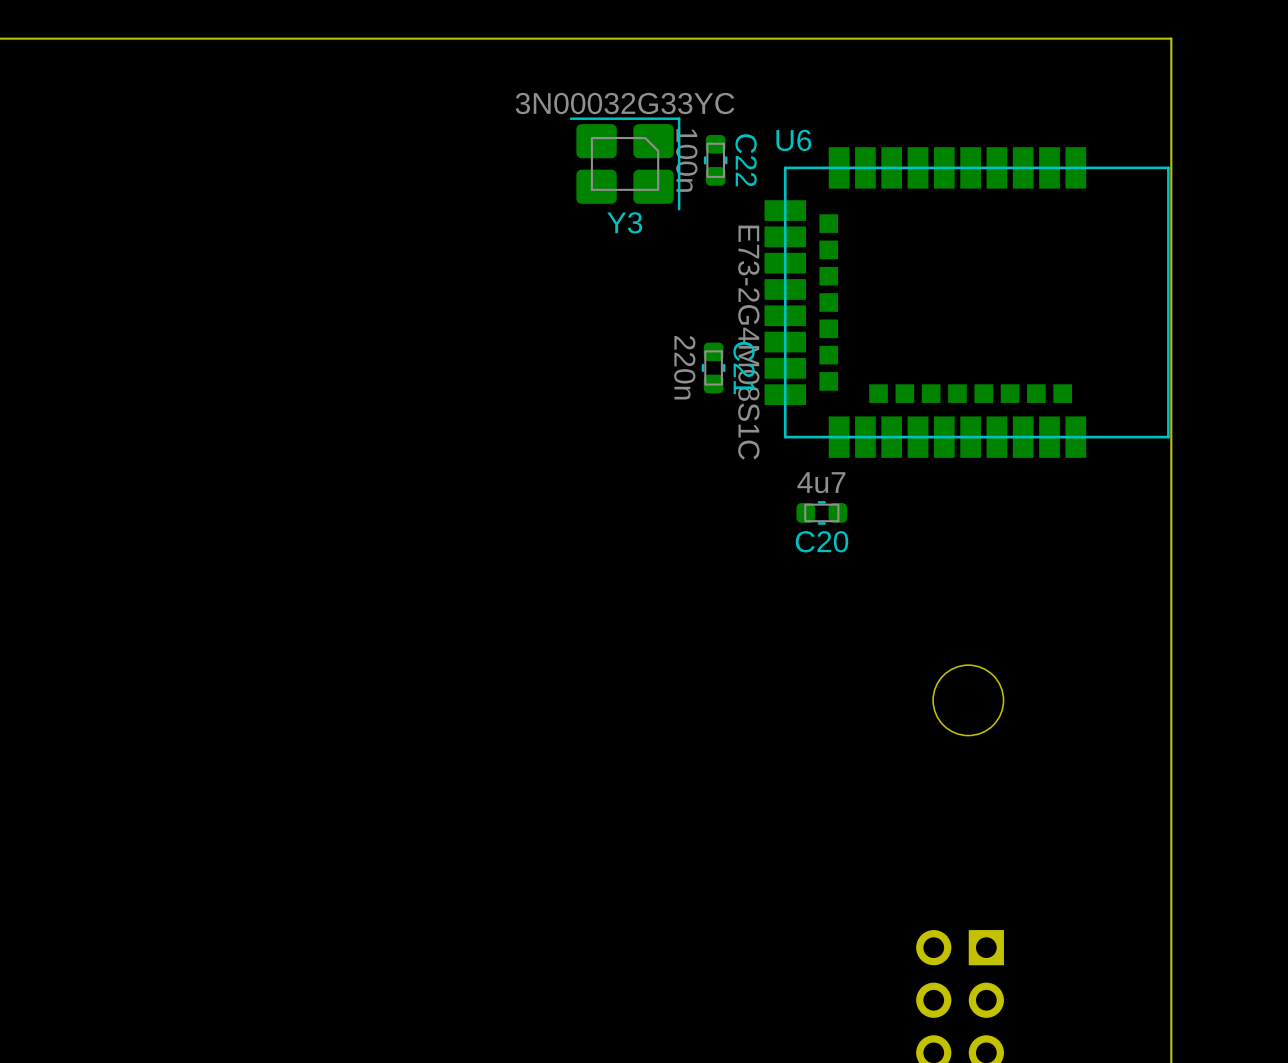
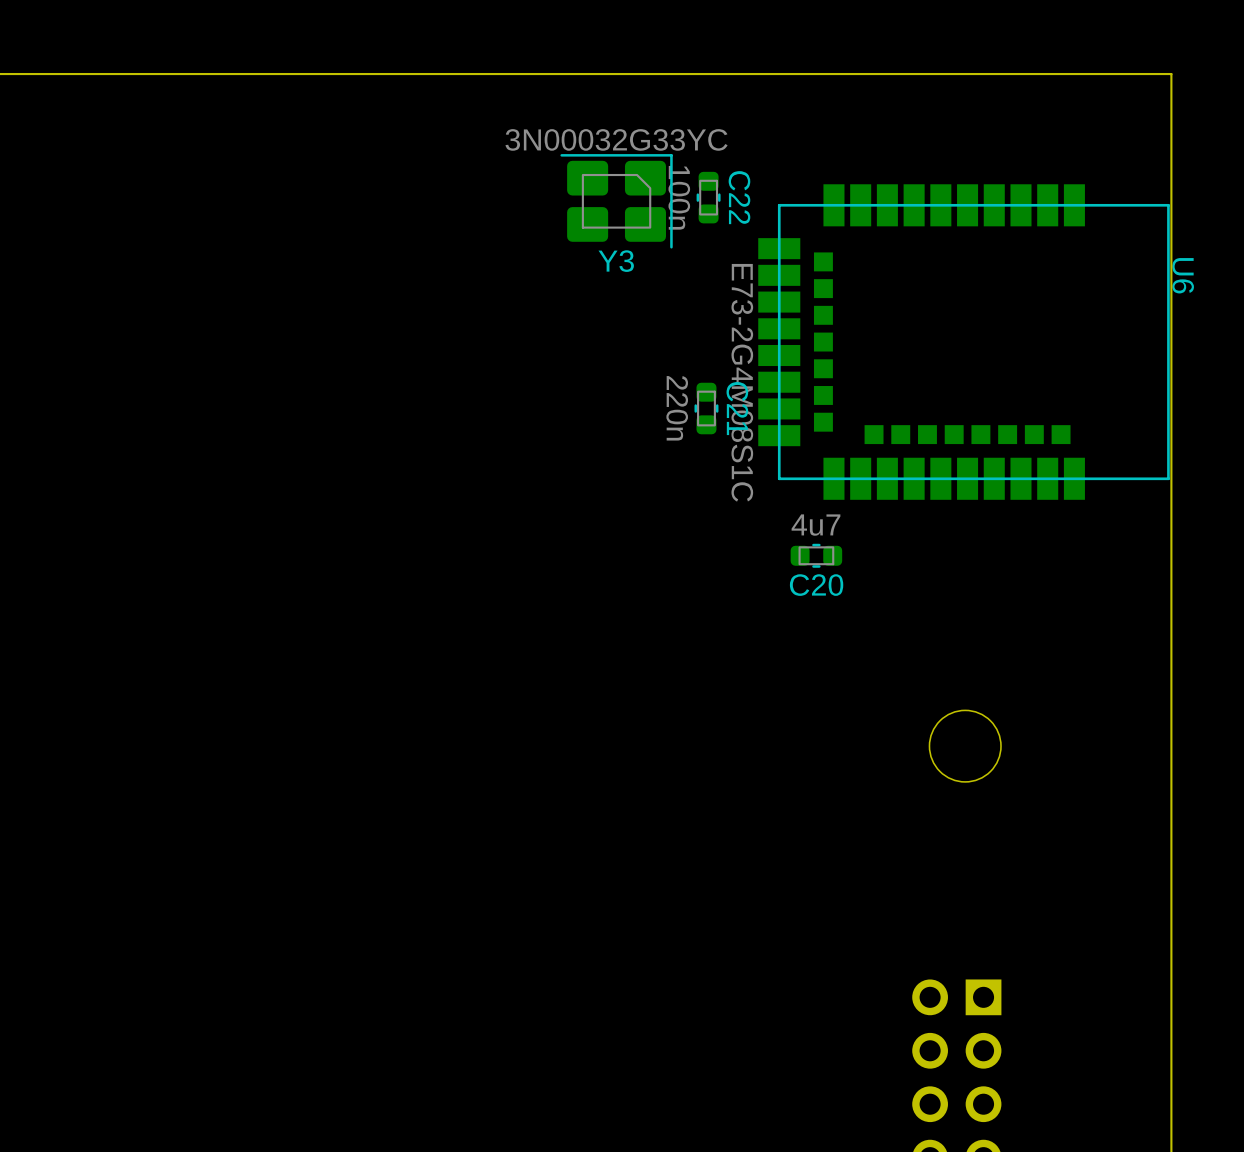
U6 name rotation: 0° (793, 140) -> 90° clockwise (1183, 275)
U6 name position: U6 (793, 140) -> U6 (1183, 275)

